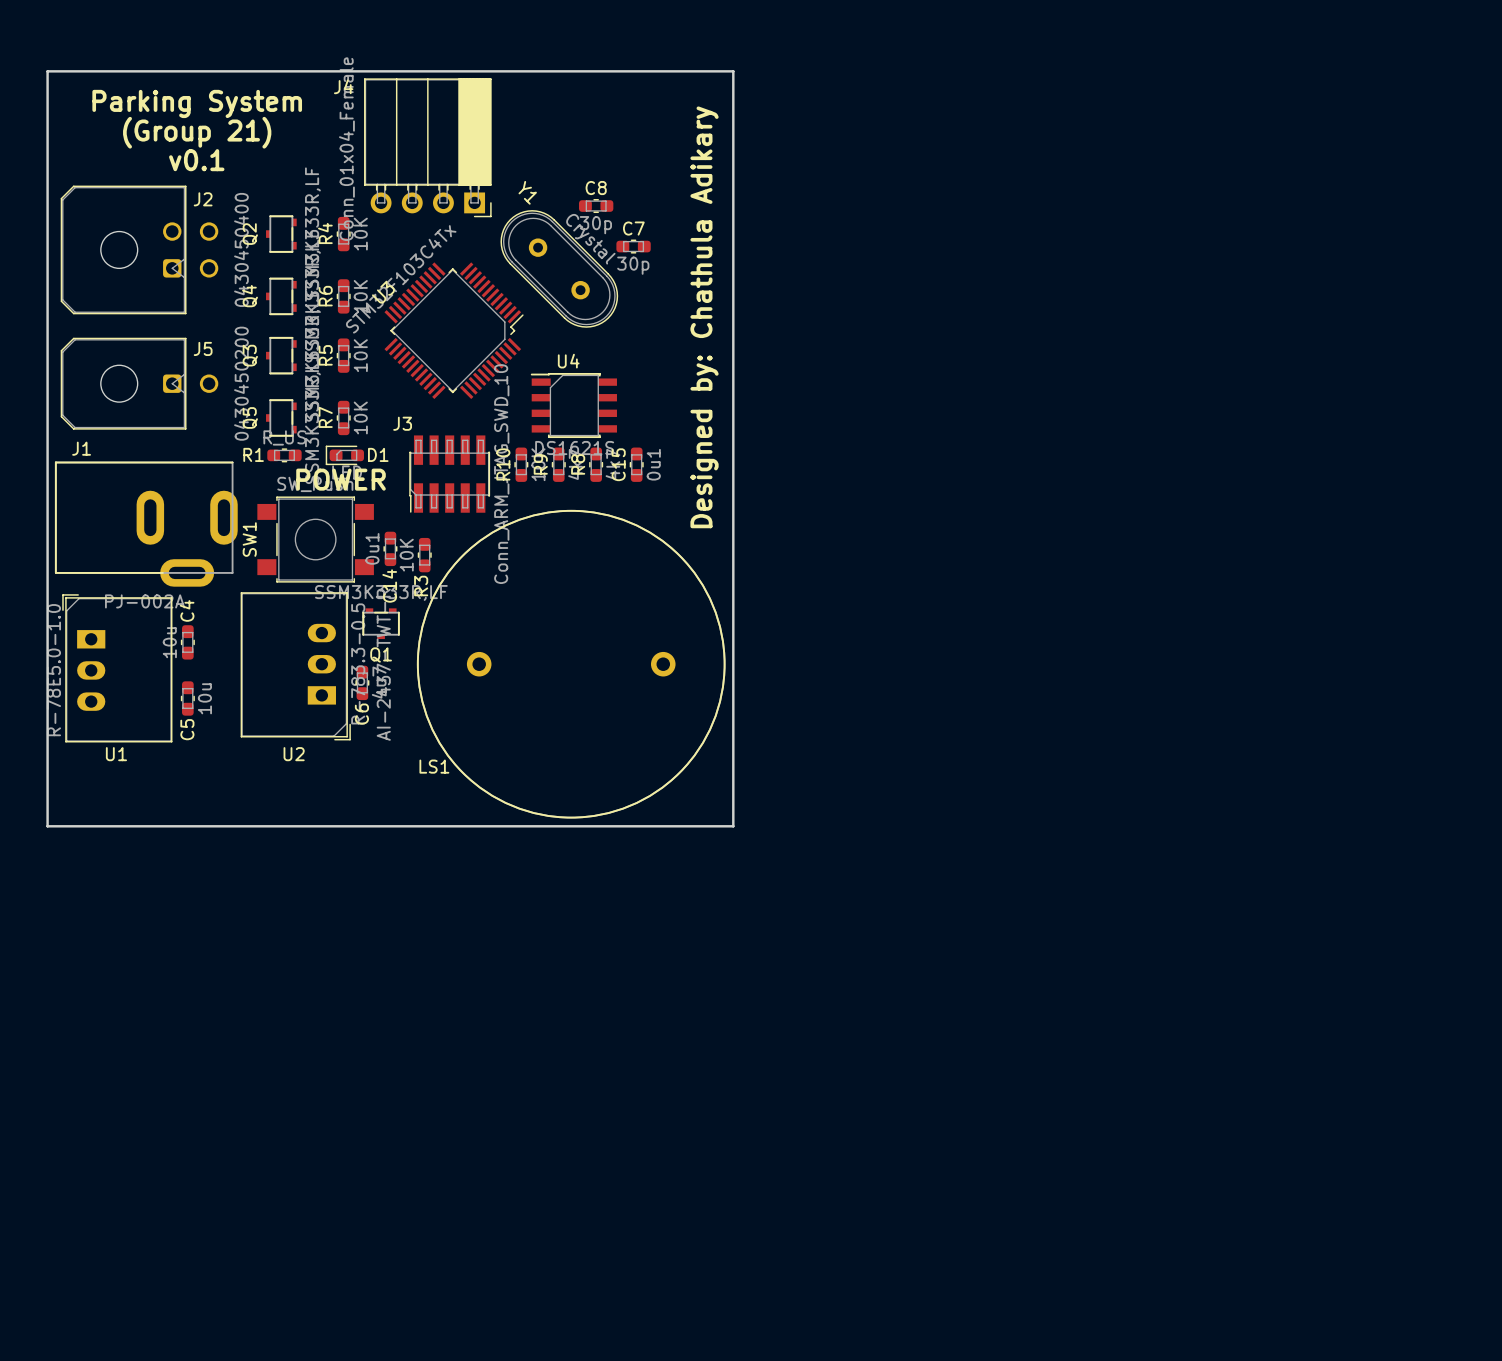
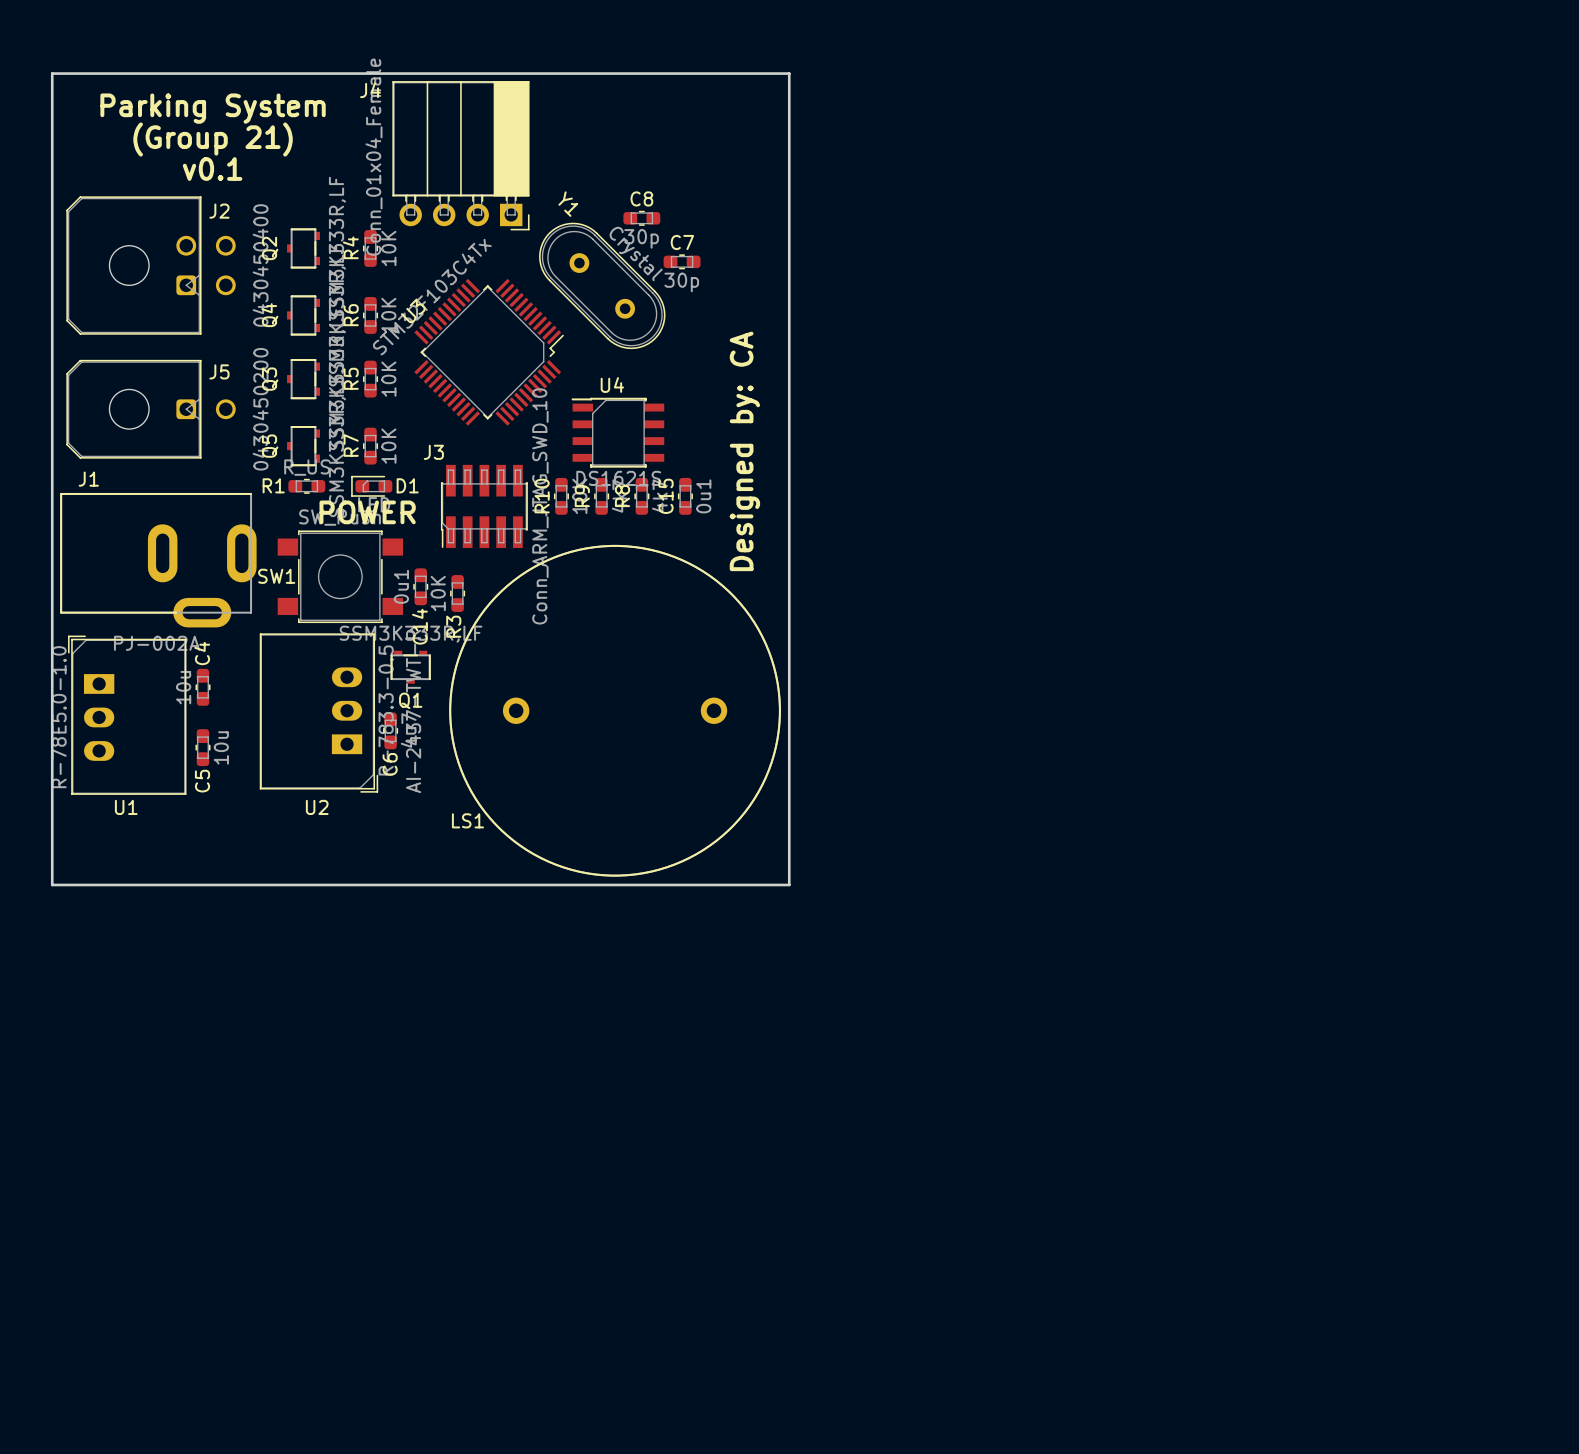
text: Designed by: Chathula Adikary (704, 317) -> Designed by: CA (744, 451)
SW1 name rotation: 0° (249, 539) -> 90° clockwise (276, 576)

